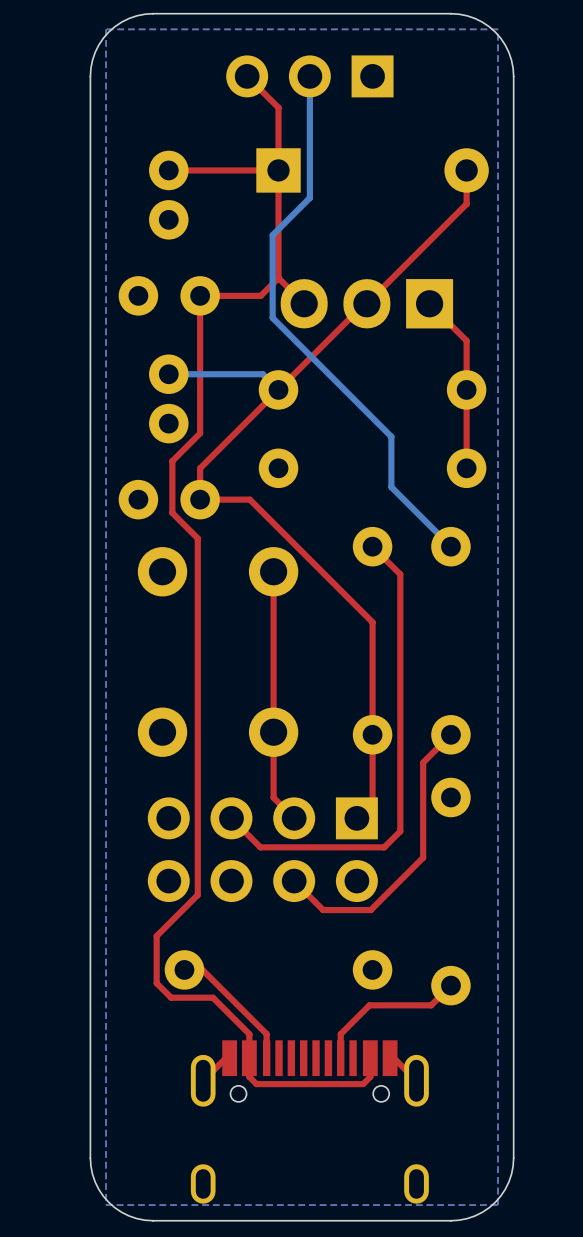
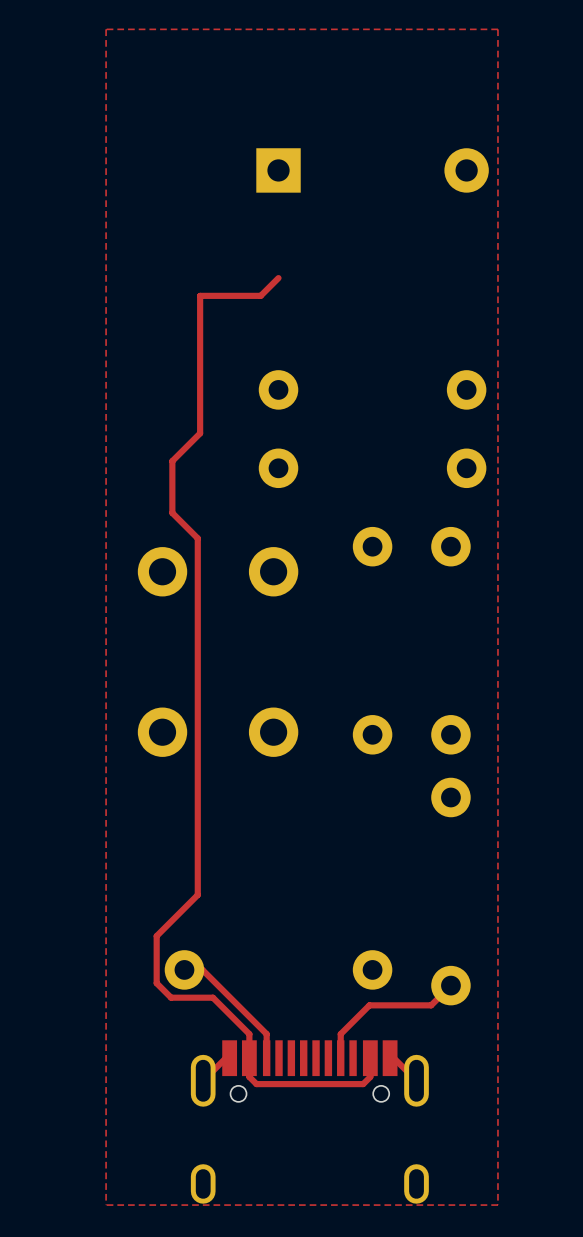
bottom zone outline: (497, 29) (497, 1205) (106, 1205) (106, 29) (497, 29) -> none
top track: (247, 76) (278, 107) (278, 278) (304, 303) -> none
bottom track: (309, 76) (309, 197) (272, 235) (272, 317) (391, 436) (391, 487) (450, 546) -> none
part: (309, 76) -> none
top track: (278, 170) (168, 170) -> none
top track: (466, 170) (466, 204) (200, 468) (200, 499) (249, 499) (372, 622) (372, 802) (356, 818) -> none
part: (168, 195) -> none
part: (169, 295) -> none
part: (366, 303) -> none
top track: (429, 303) (466, 340) (466, 468) -> none
bottom track: (168, 374) (262, 374) (278, 389) -> none
part: (168, 398) -> none
part: (169, 499) -> none
top track: (372, 546) (400, 574) (400, 831) (384, 847) (260, 847) (231, 818) -> none
top track: (273, 571) (273, 797) (294, 818) -> none
top track: (450, 734) (423, 762) (423, 857) (370, 910) (323, 910) (294, 881) -> none
part: (262, 849) -> none
board edge: (450, 1220) (144, 1220) (129, 1215) (108, 1202) (98, 1189) (92, 1174) (90, 1158) (90, 76) (92, 60) (103, 38) (114, 26) (136, 15) (153, 13) (459, 14) (474, 18) (489, 26) (500, 38) (511, 60) (513, 76) (513, 1158) (508, 1182) (495, 1202) (474, 1215) (450, 1220) -> none

